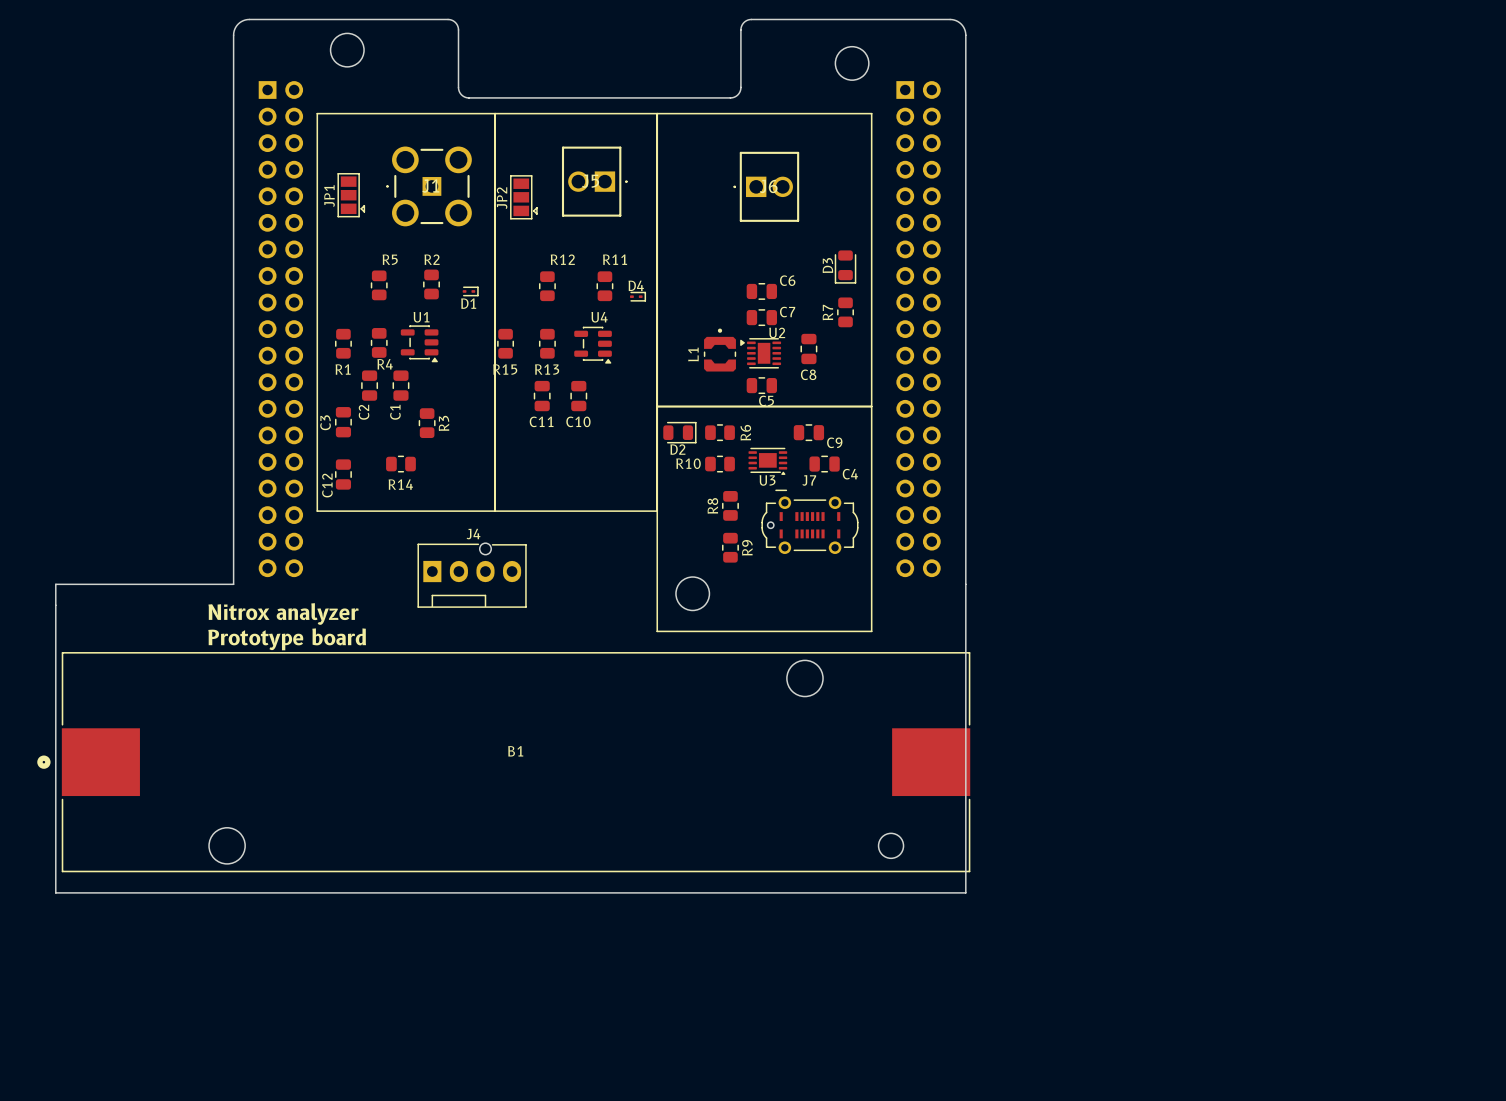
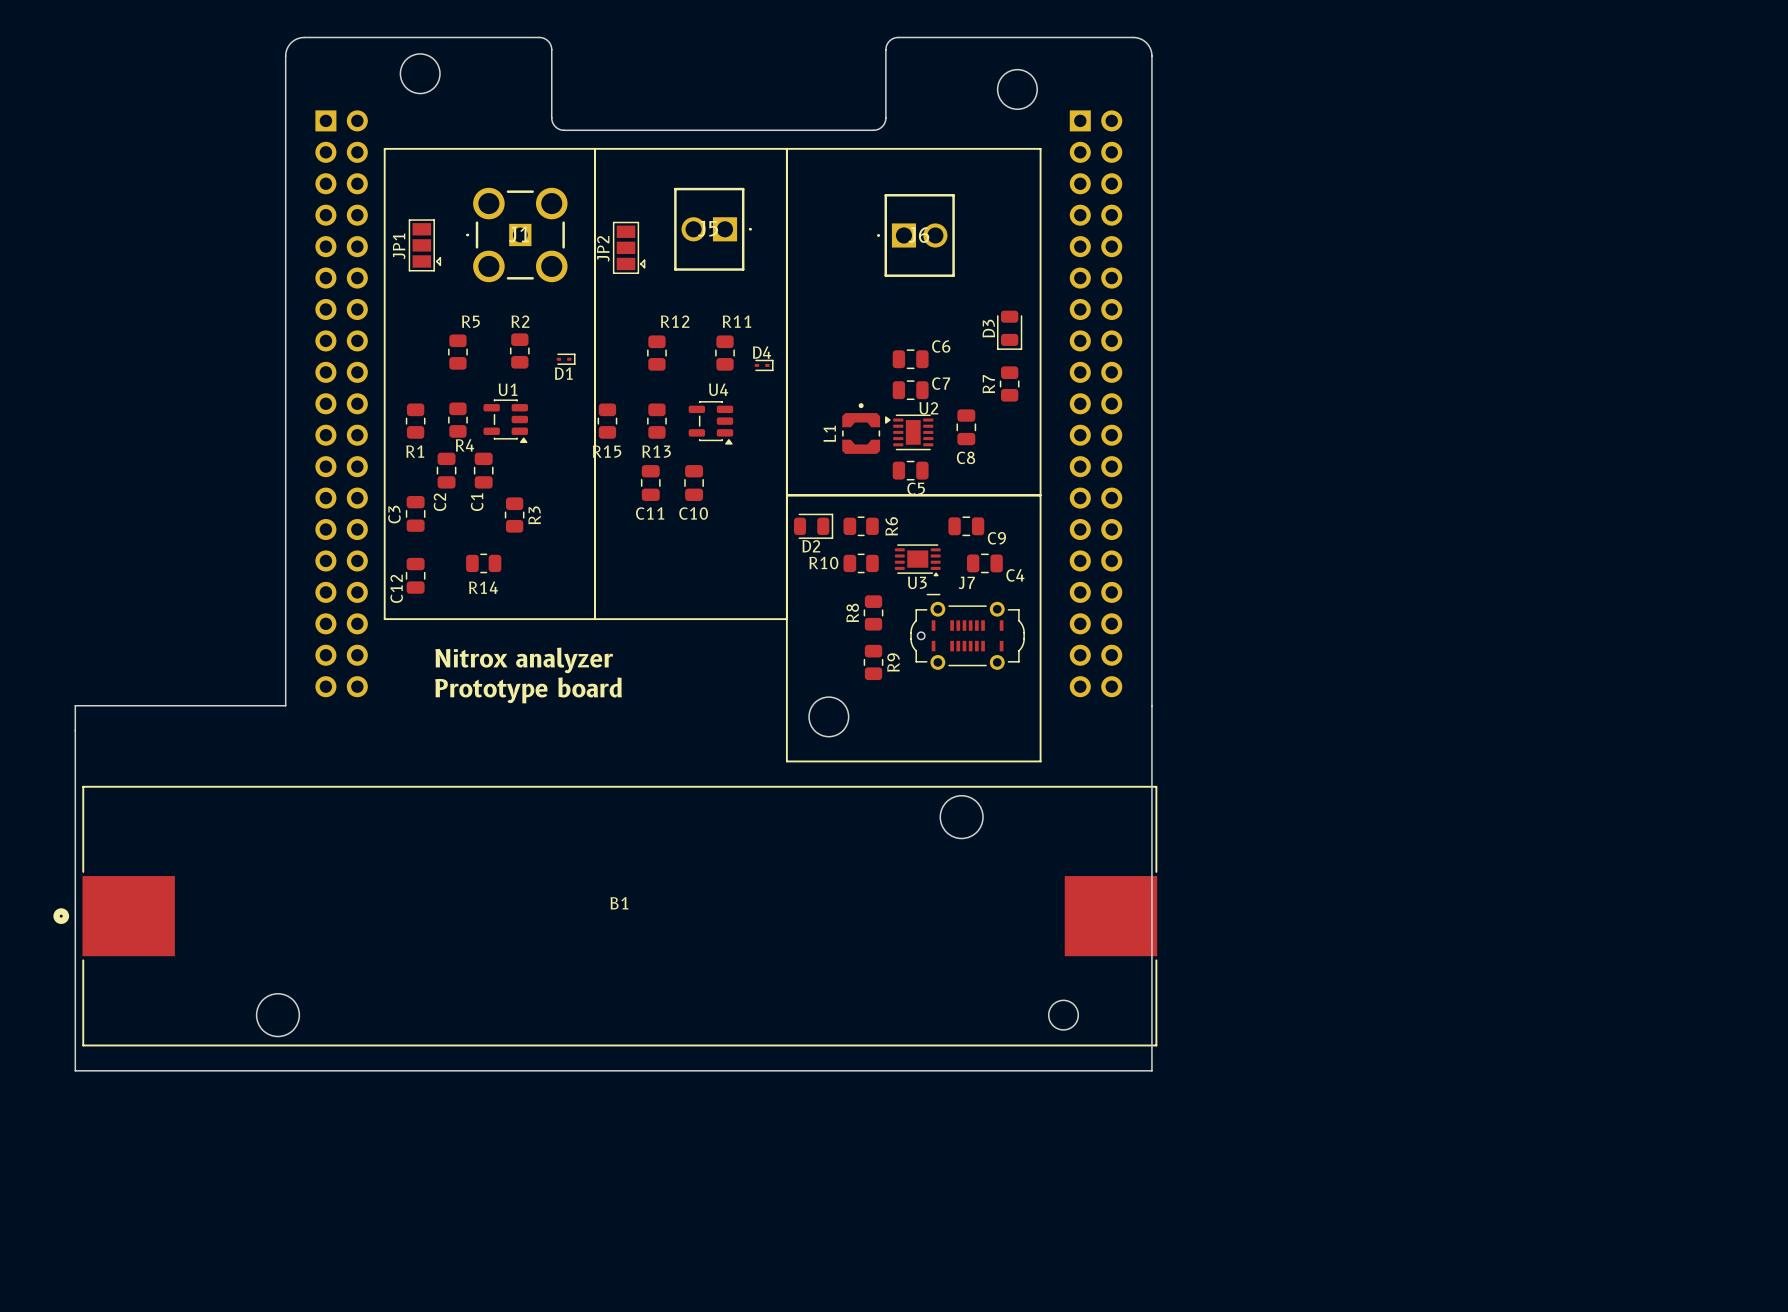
J4: (472, 575) -> none
text position: Nitrox analyzer (283, 614) -> Nitrox analyzer (524, 660)
text position: Prototype board (287, 639) -> Prototype board (528, 690)

